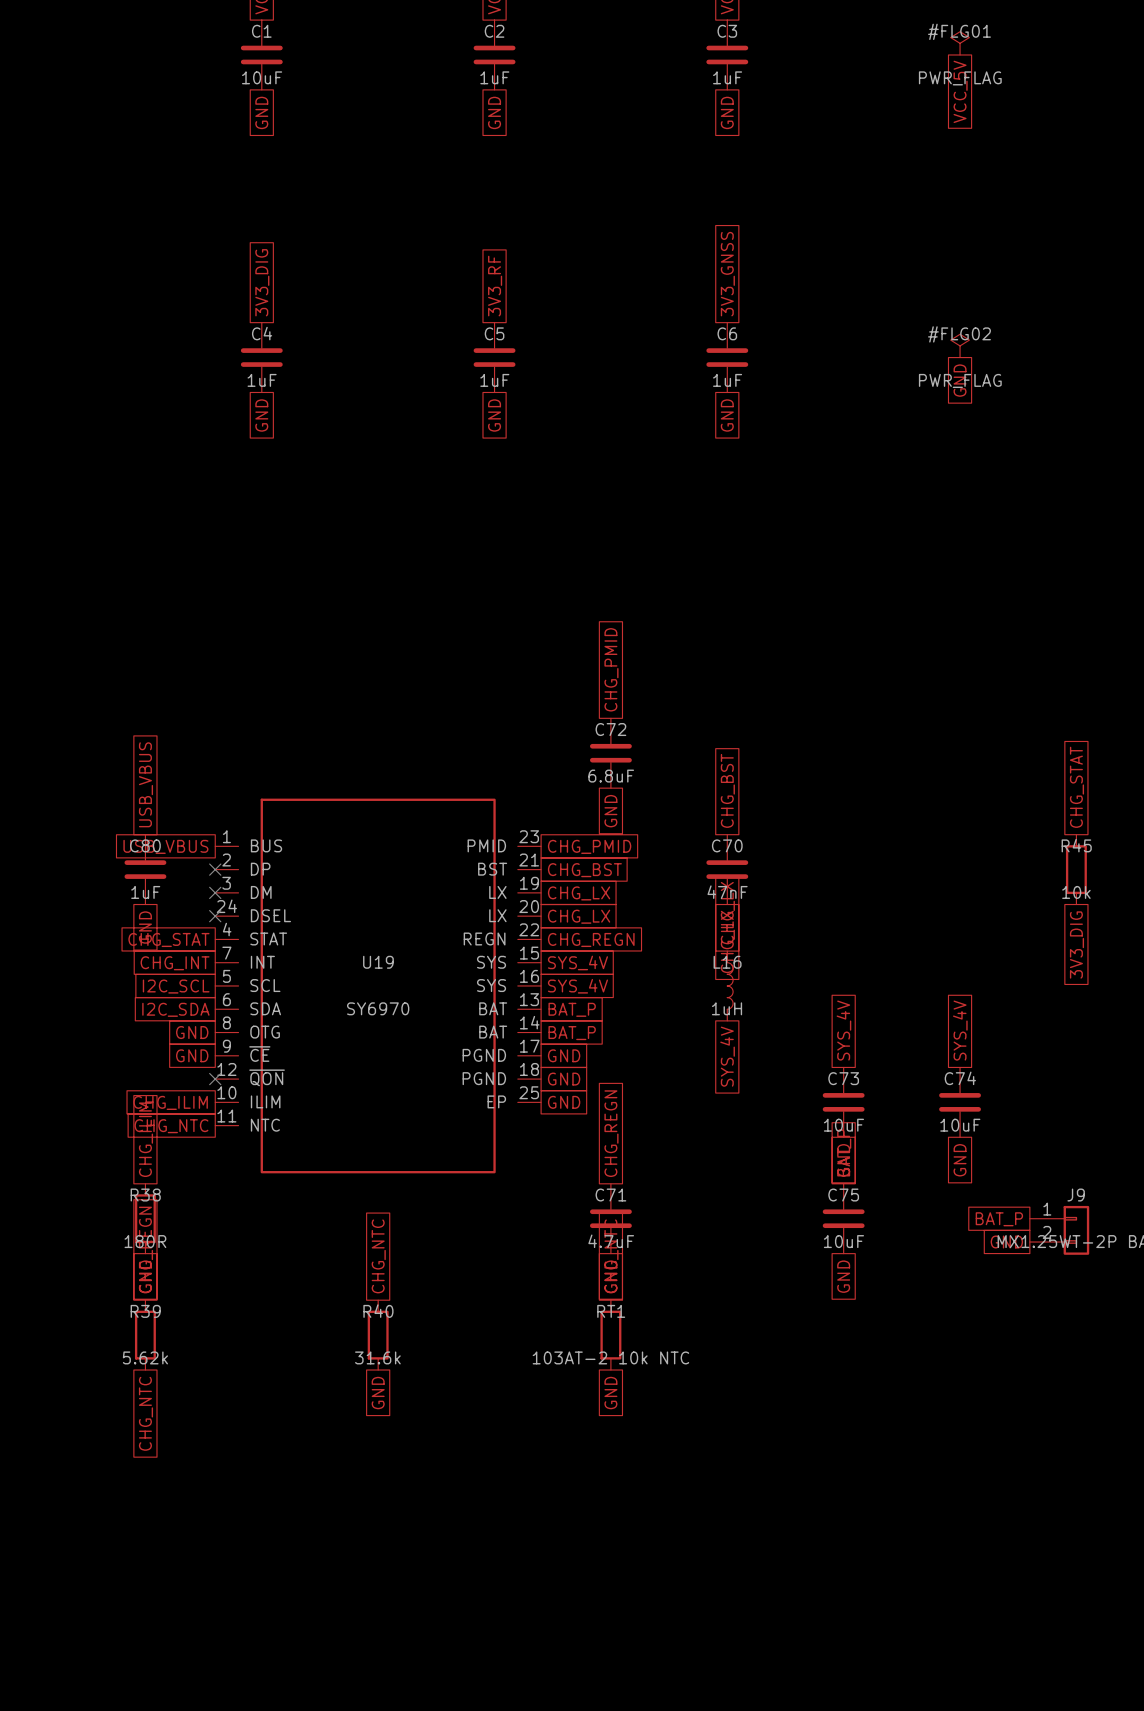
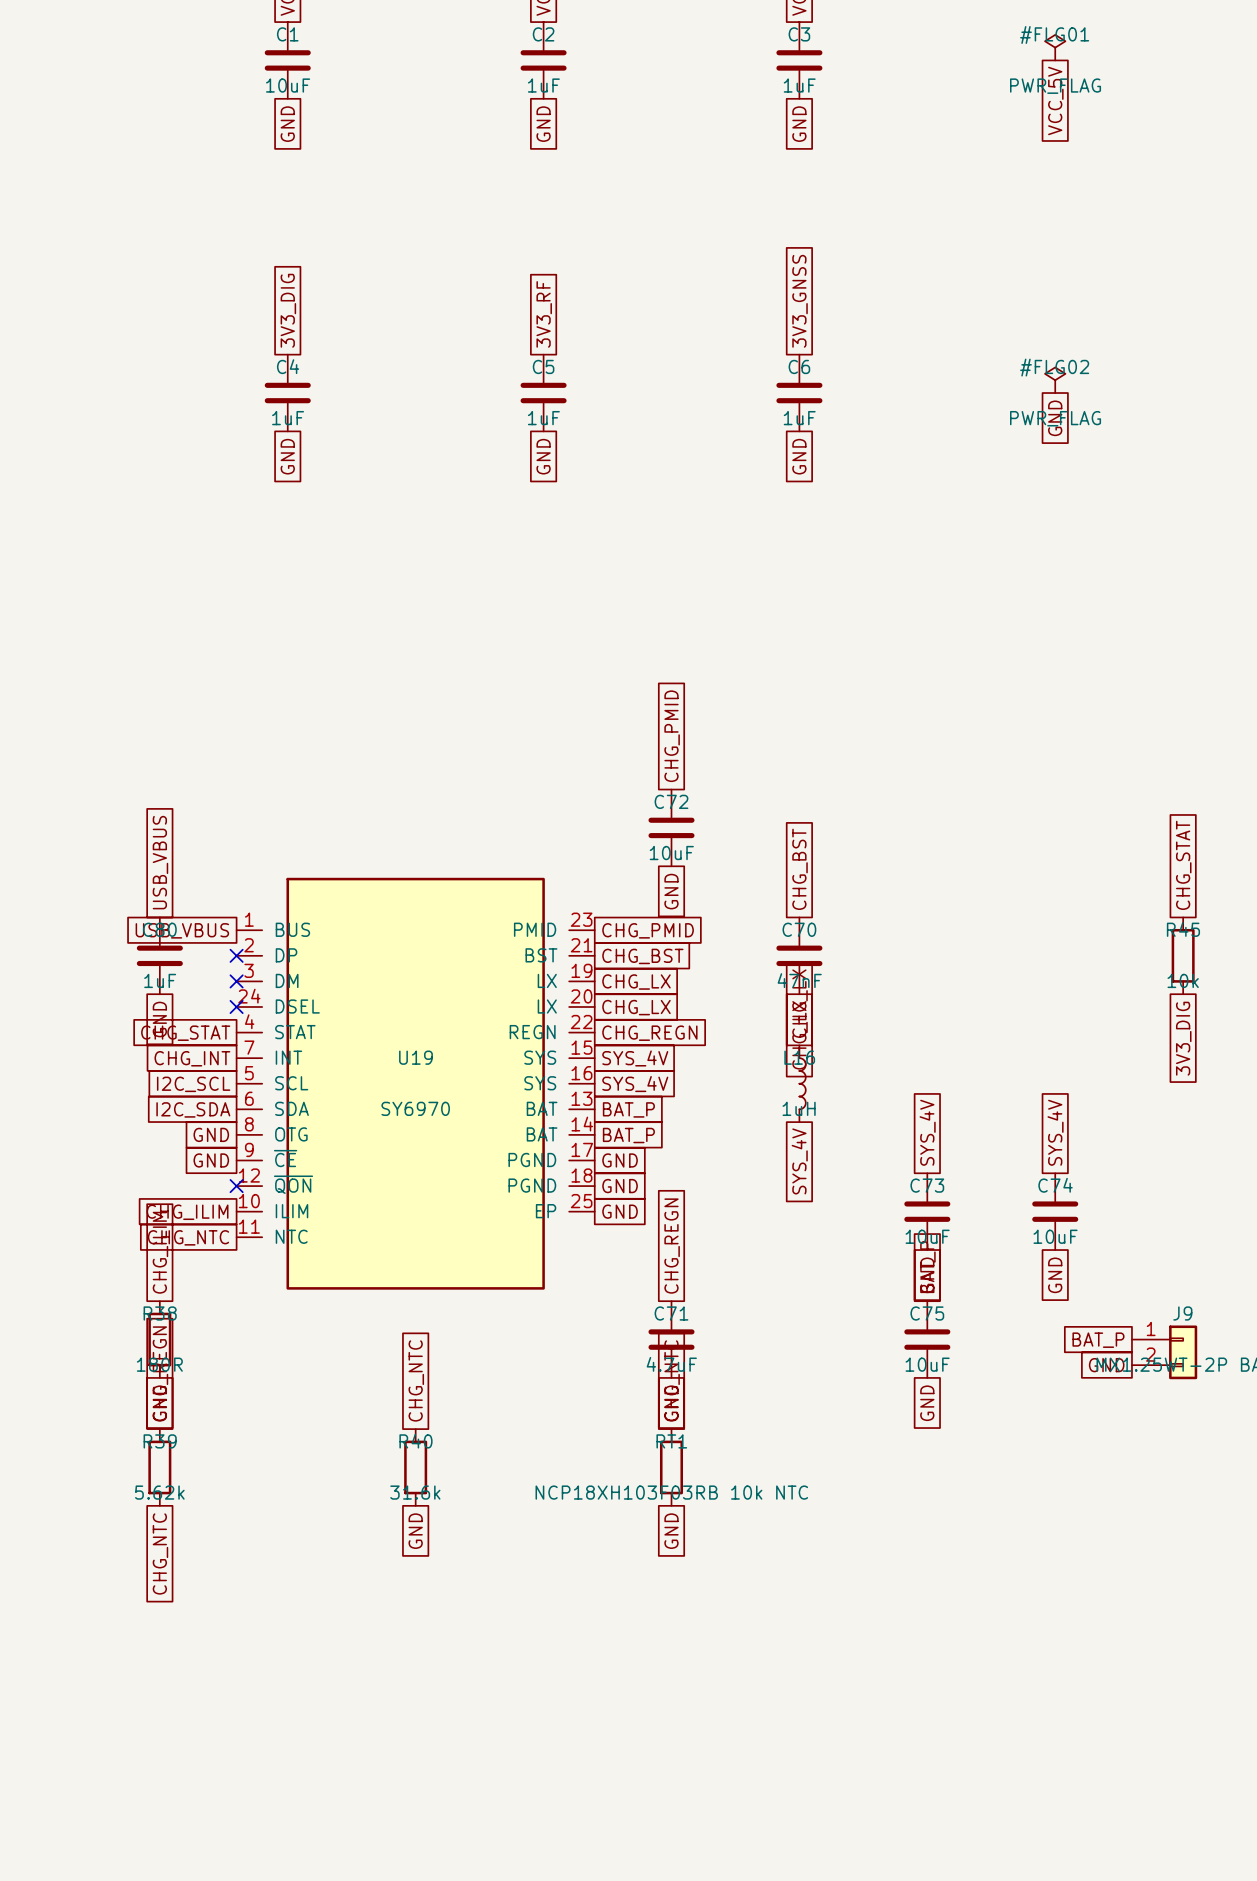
C72 value: 6.8uF (611, 776) -> 10uF (671, 853)
RT1 value: 103AT-2 10k NTC (610, 1357) -> NCP18XH103F03RB 10k NTC (671, 1492)

